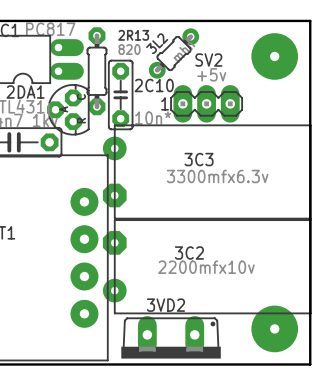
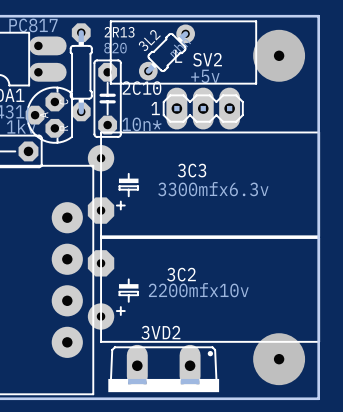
drawing: none -> [110, 20, 257, 85]
3C3 footprint: [102, 124, 312, 220] -> [87, 131, 320, 237]
3C2 footprint: [102, 219, 312, 314] -> [87, 237, 320, 343]

